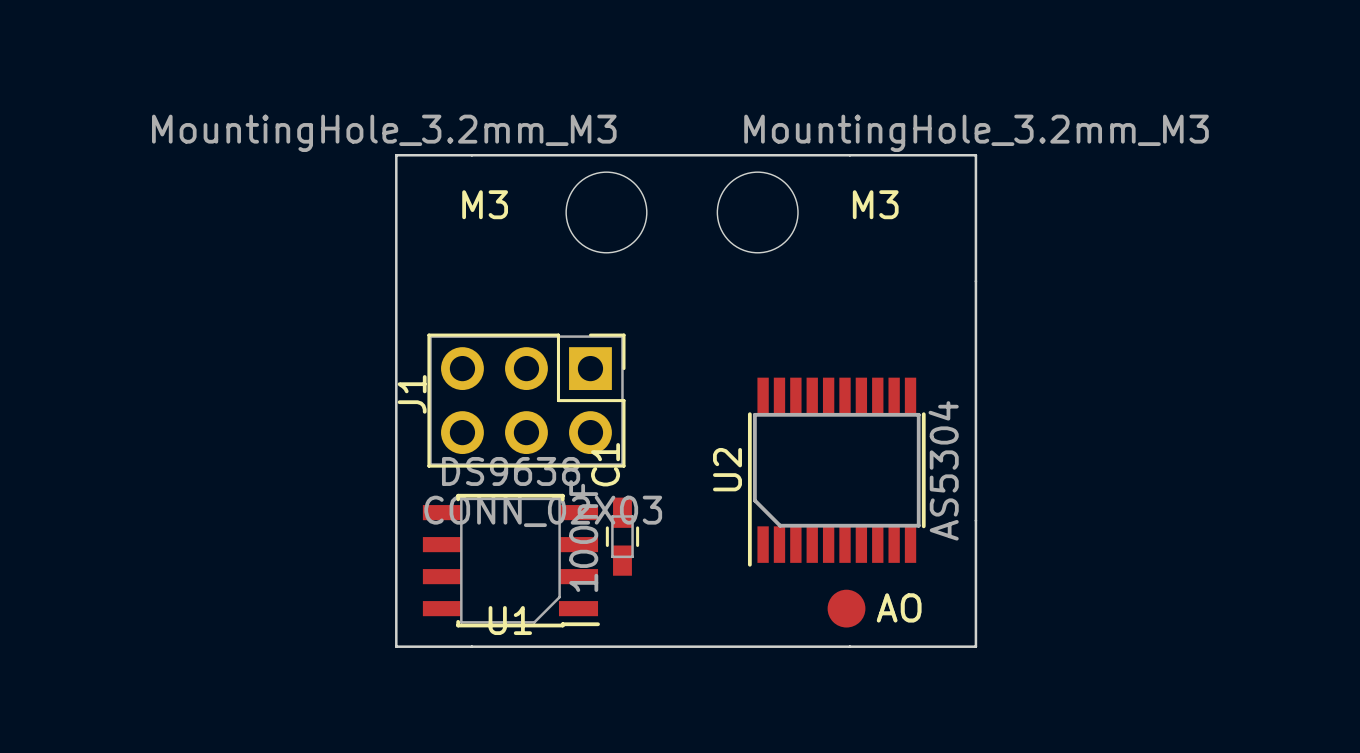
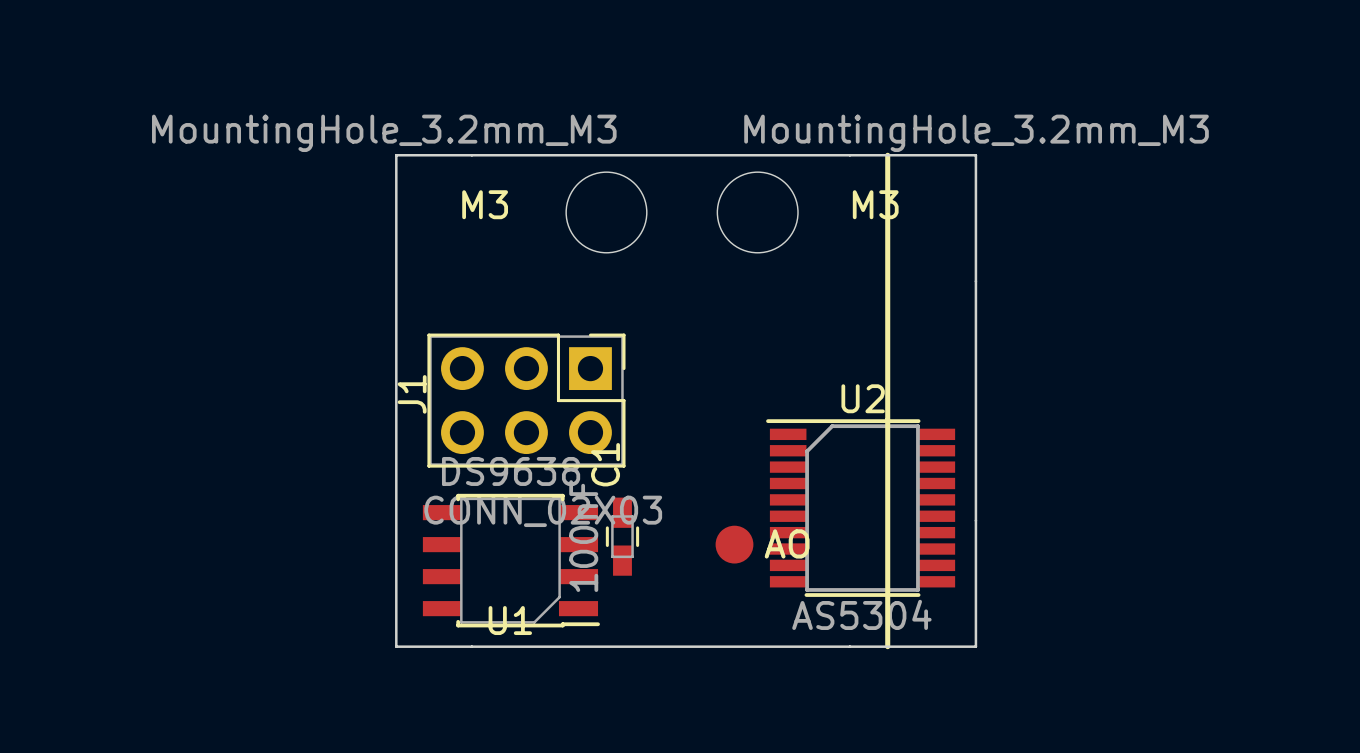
line: none -> (887, 155) (887, 646)
U2 rotation: 0° (836, 472) -> 90° clockwise (860, 508)
part position: (846, 608) -> (734, 544)

